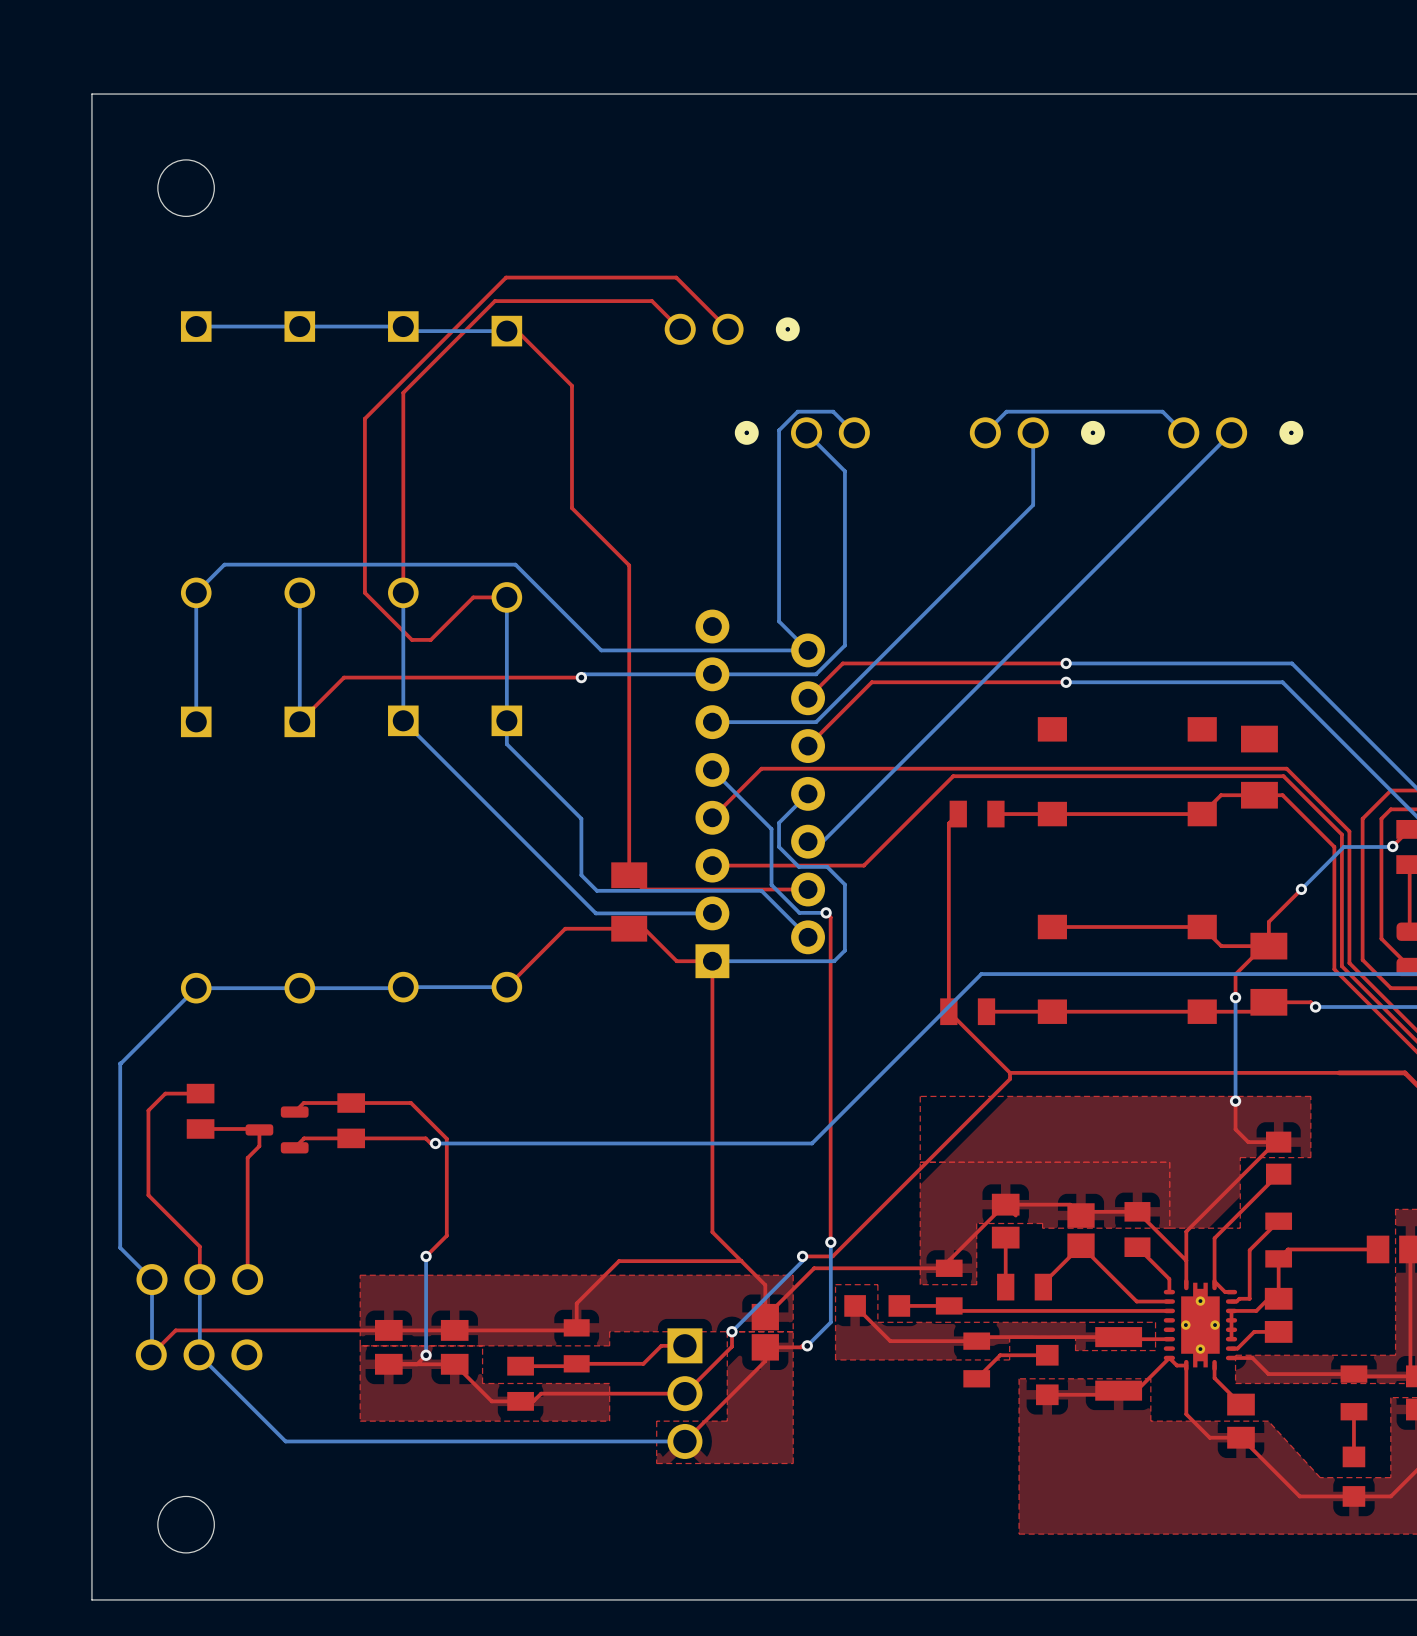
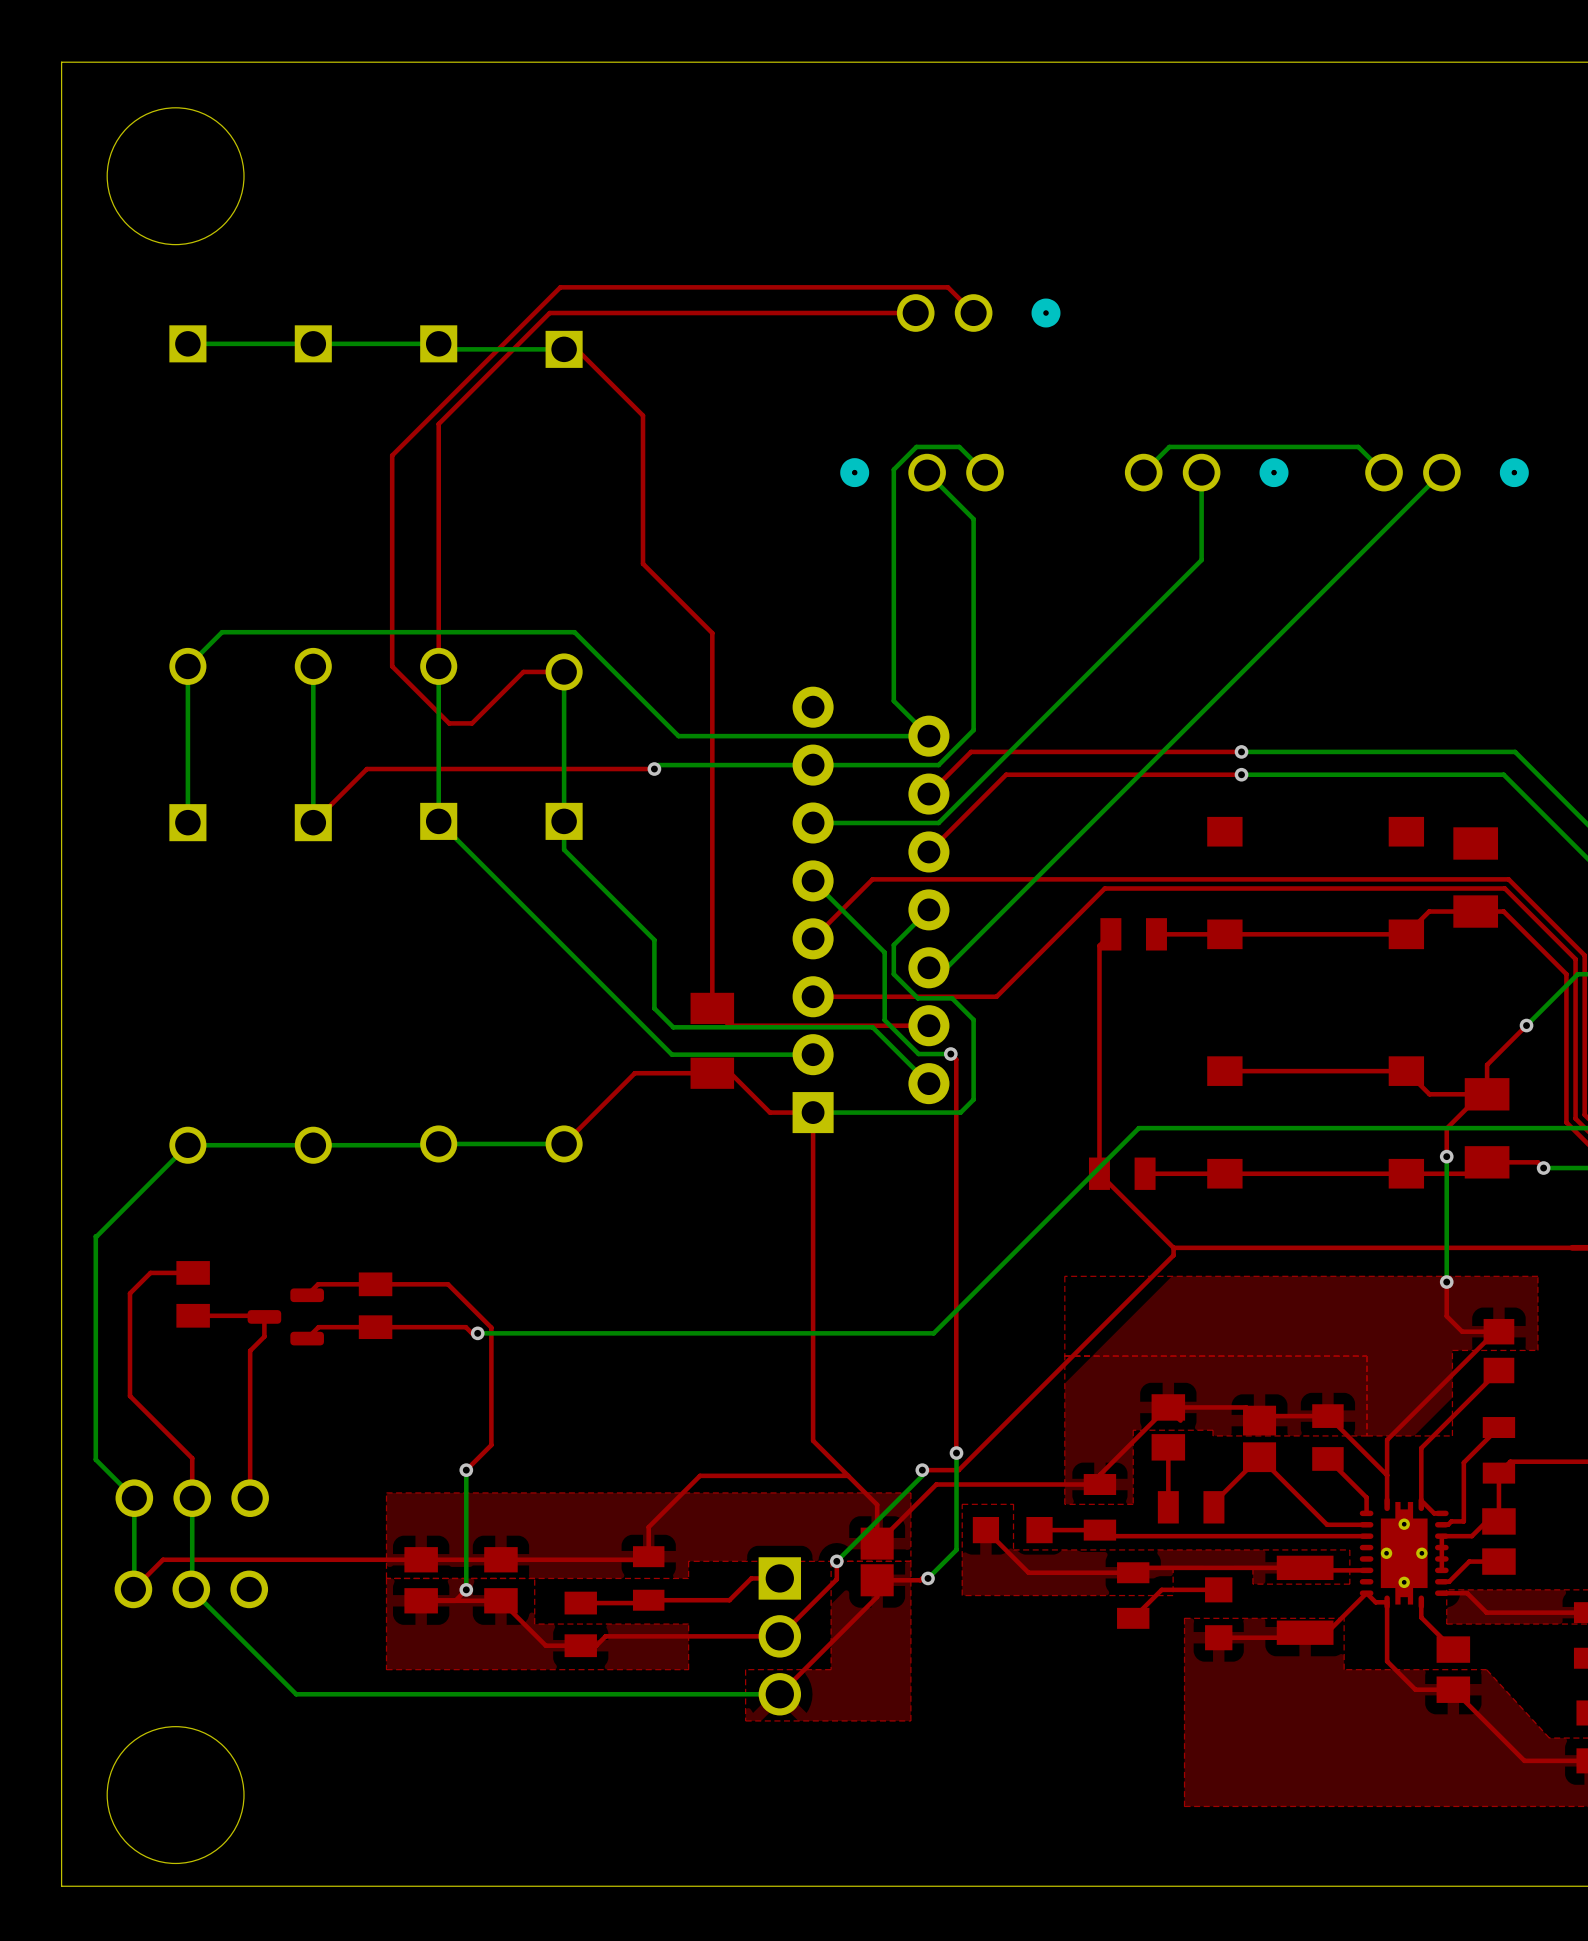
round board edge size: [157, 159, 215, 217] -> [106, 107, 245, 246]
top track: (503, 279) (506, 277) (676, 277) (728, 329) -> (560, 287) (947, 287) (973, 313)
top track: (651, 301) (680, 329) -> (739, 313) (915, 313)
part position: (732, 329) -> (978, 313)
round board edge size: [157, 1495, 215, 1554] -> [106, 1726, 245, 1865]

